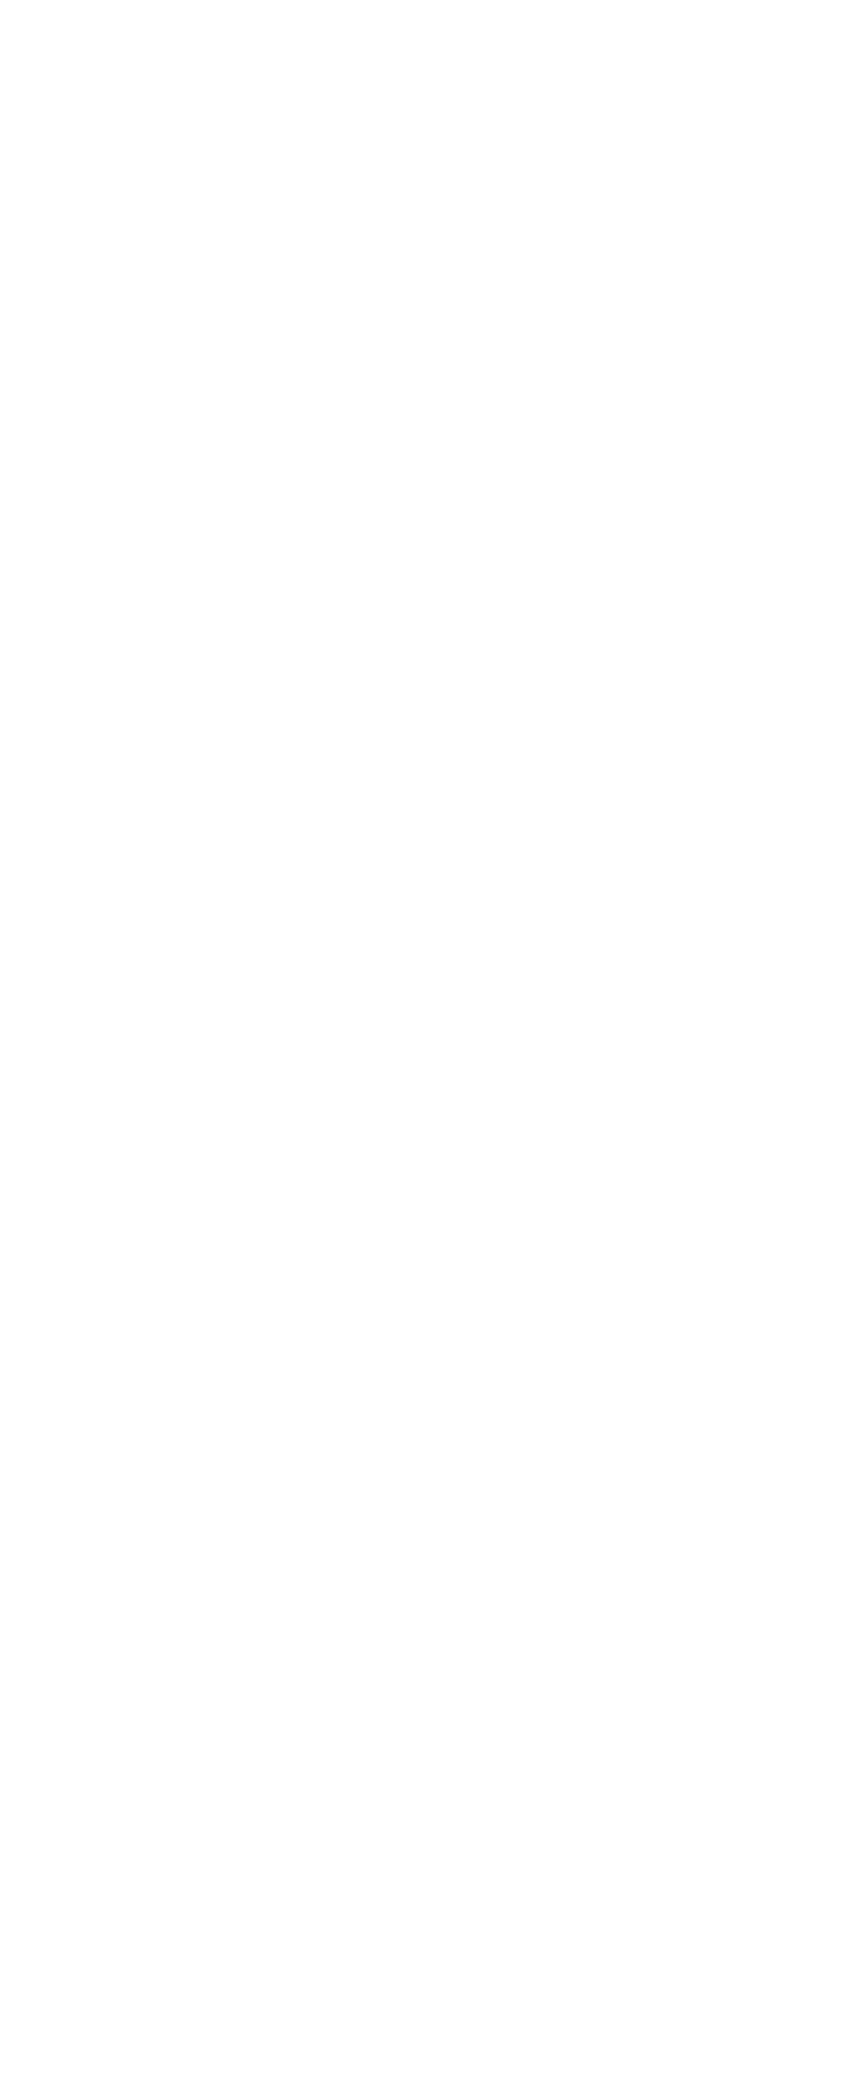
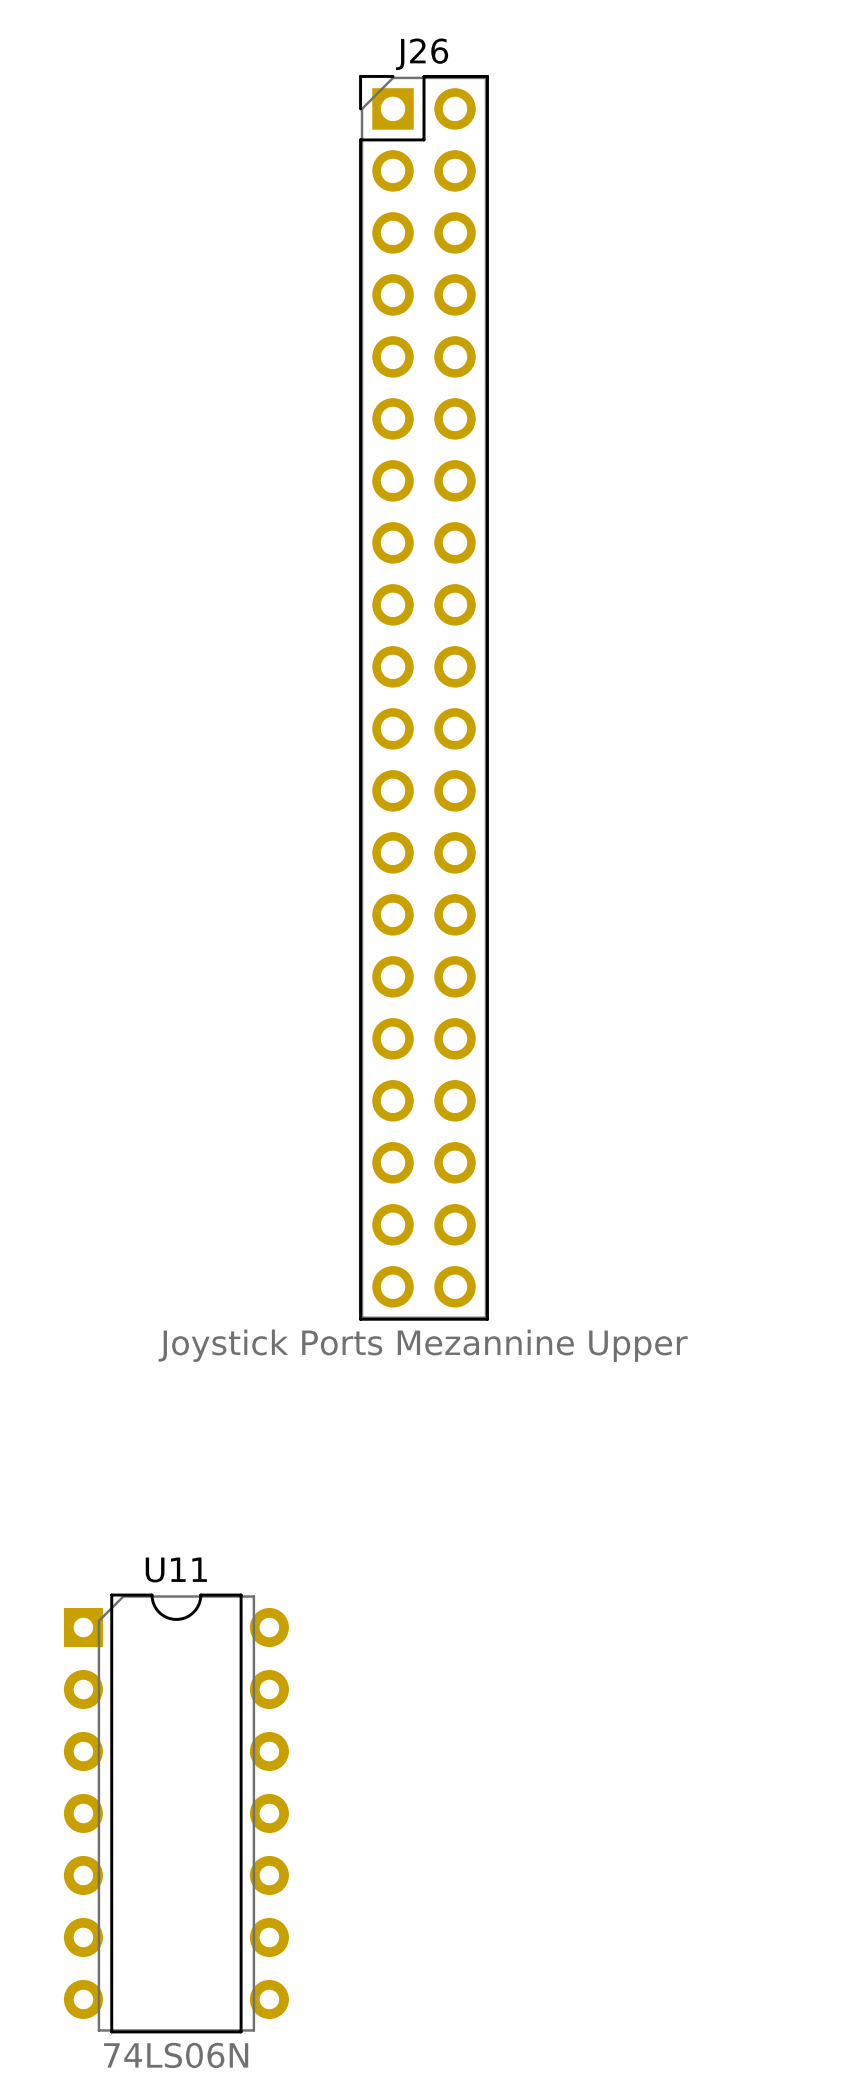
J26: none -> Joystick Ports Mezannine Upper (424, 697)
U11: none -> 74LS06N (176, 1813)

